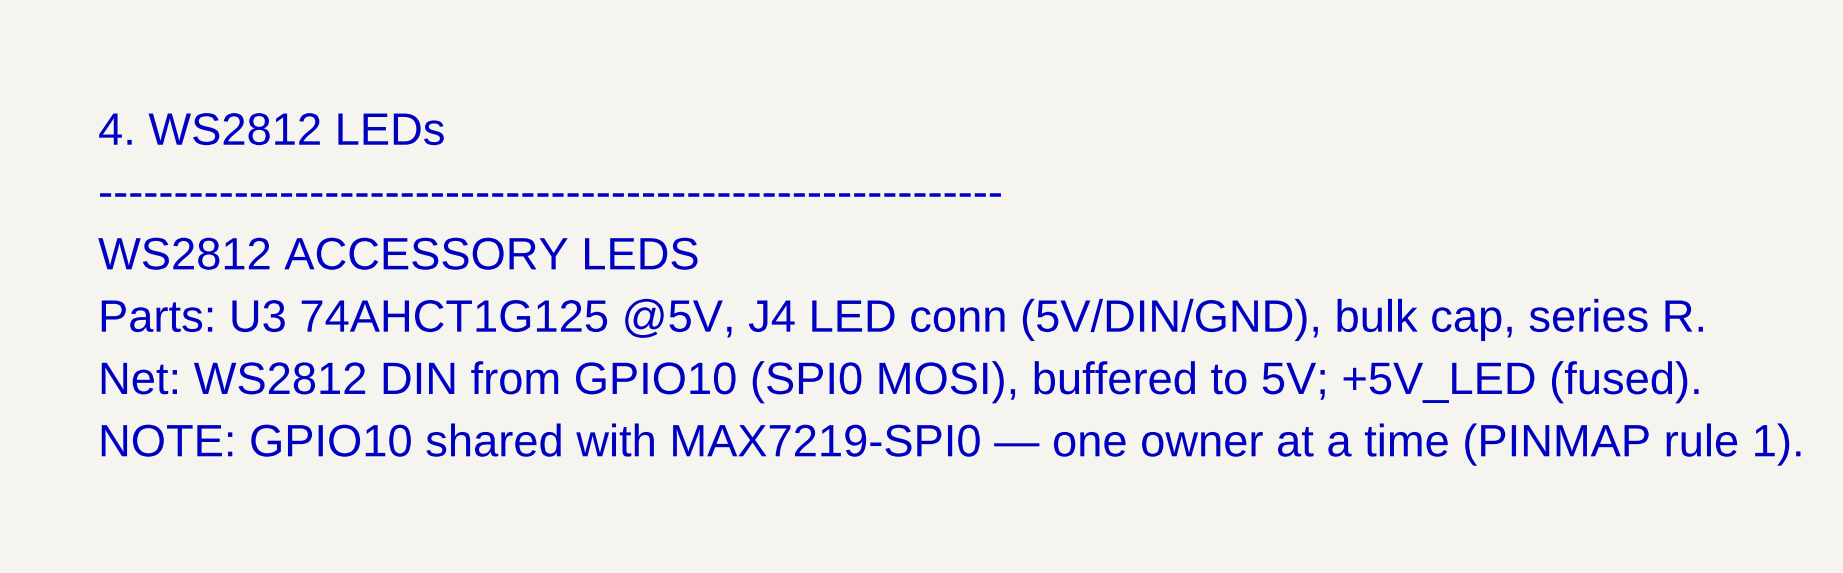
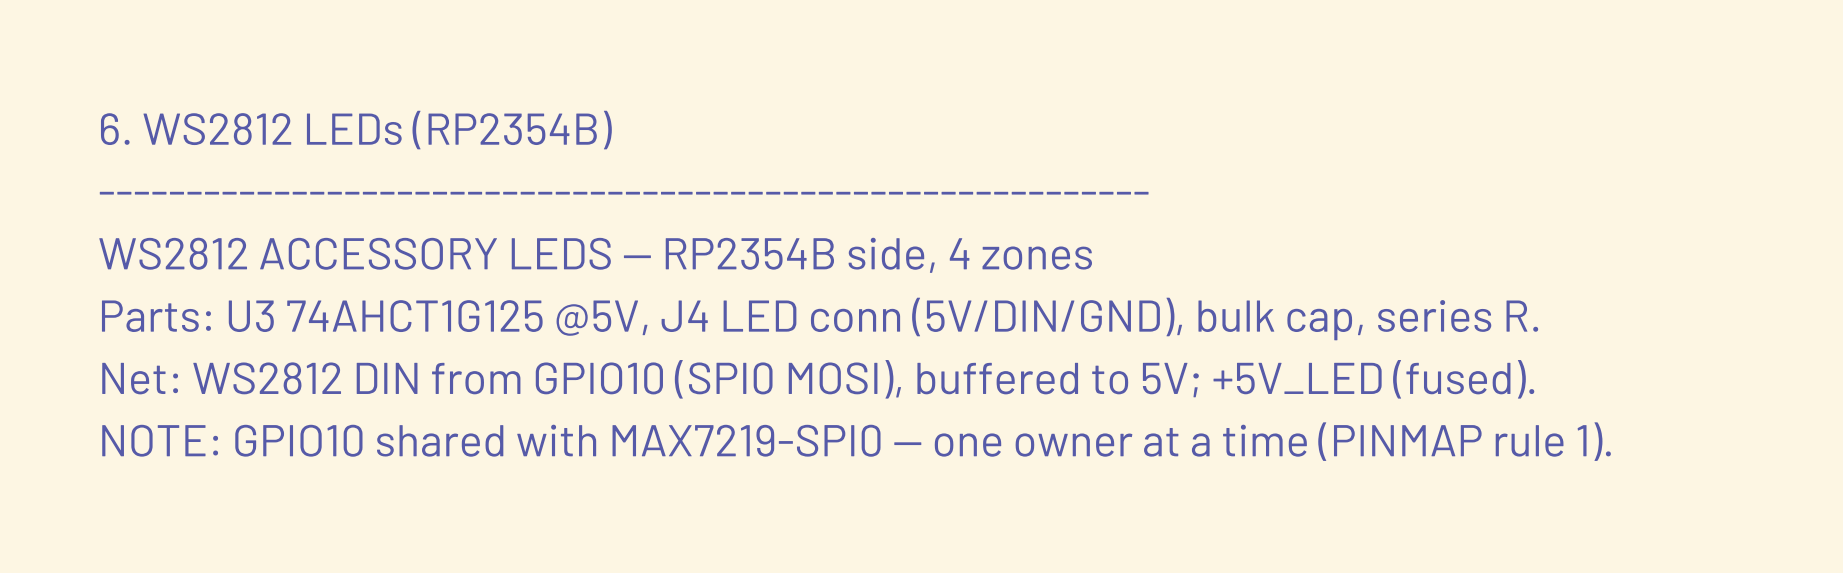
text: 4. WS2812 LEDs (271, 129) -> 6. WS2812 LEDs (RP2354B) (356, 130)
text: WS2812 ACCESSORY LEDS (397, 253) -> WS2812 ACCESSORY LEDS — RP2354B side, 4 zones (595, 255)

